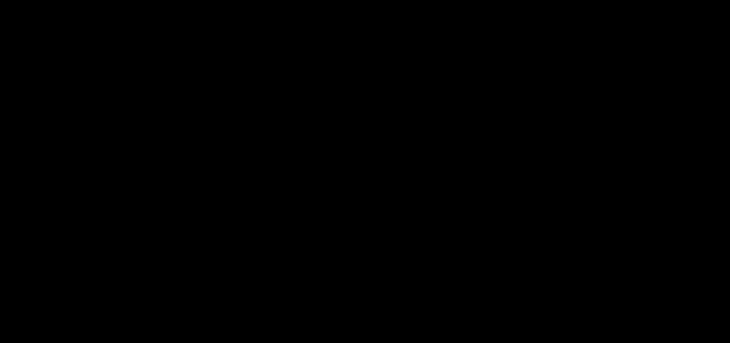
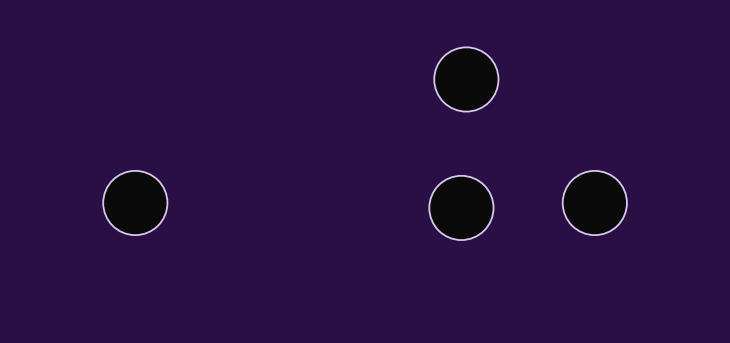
part: none -> (466, 79)
part: none -> (135, 202)
part: none -> (594, 202)
part: none -> (461, 207)

